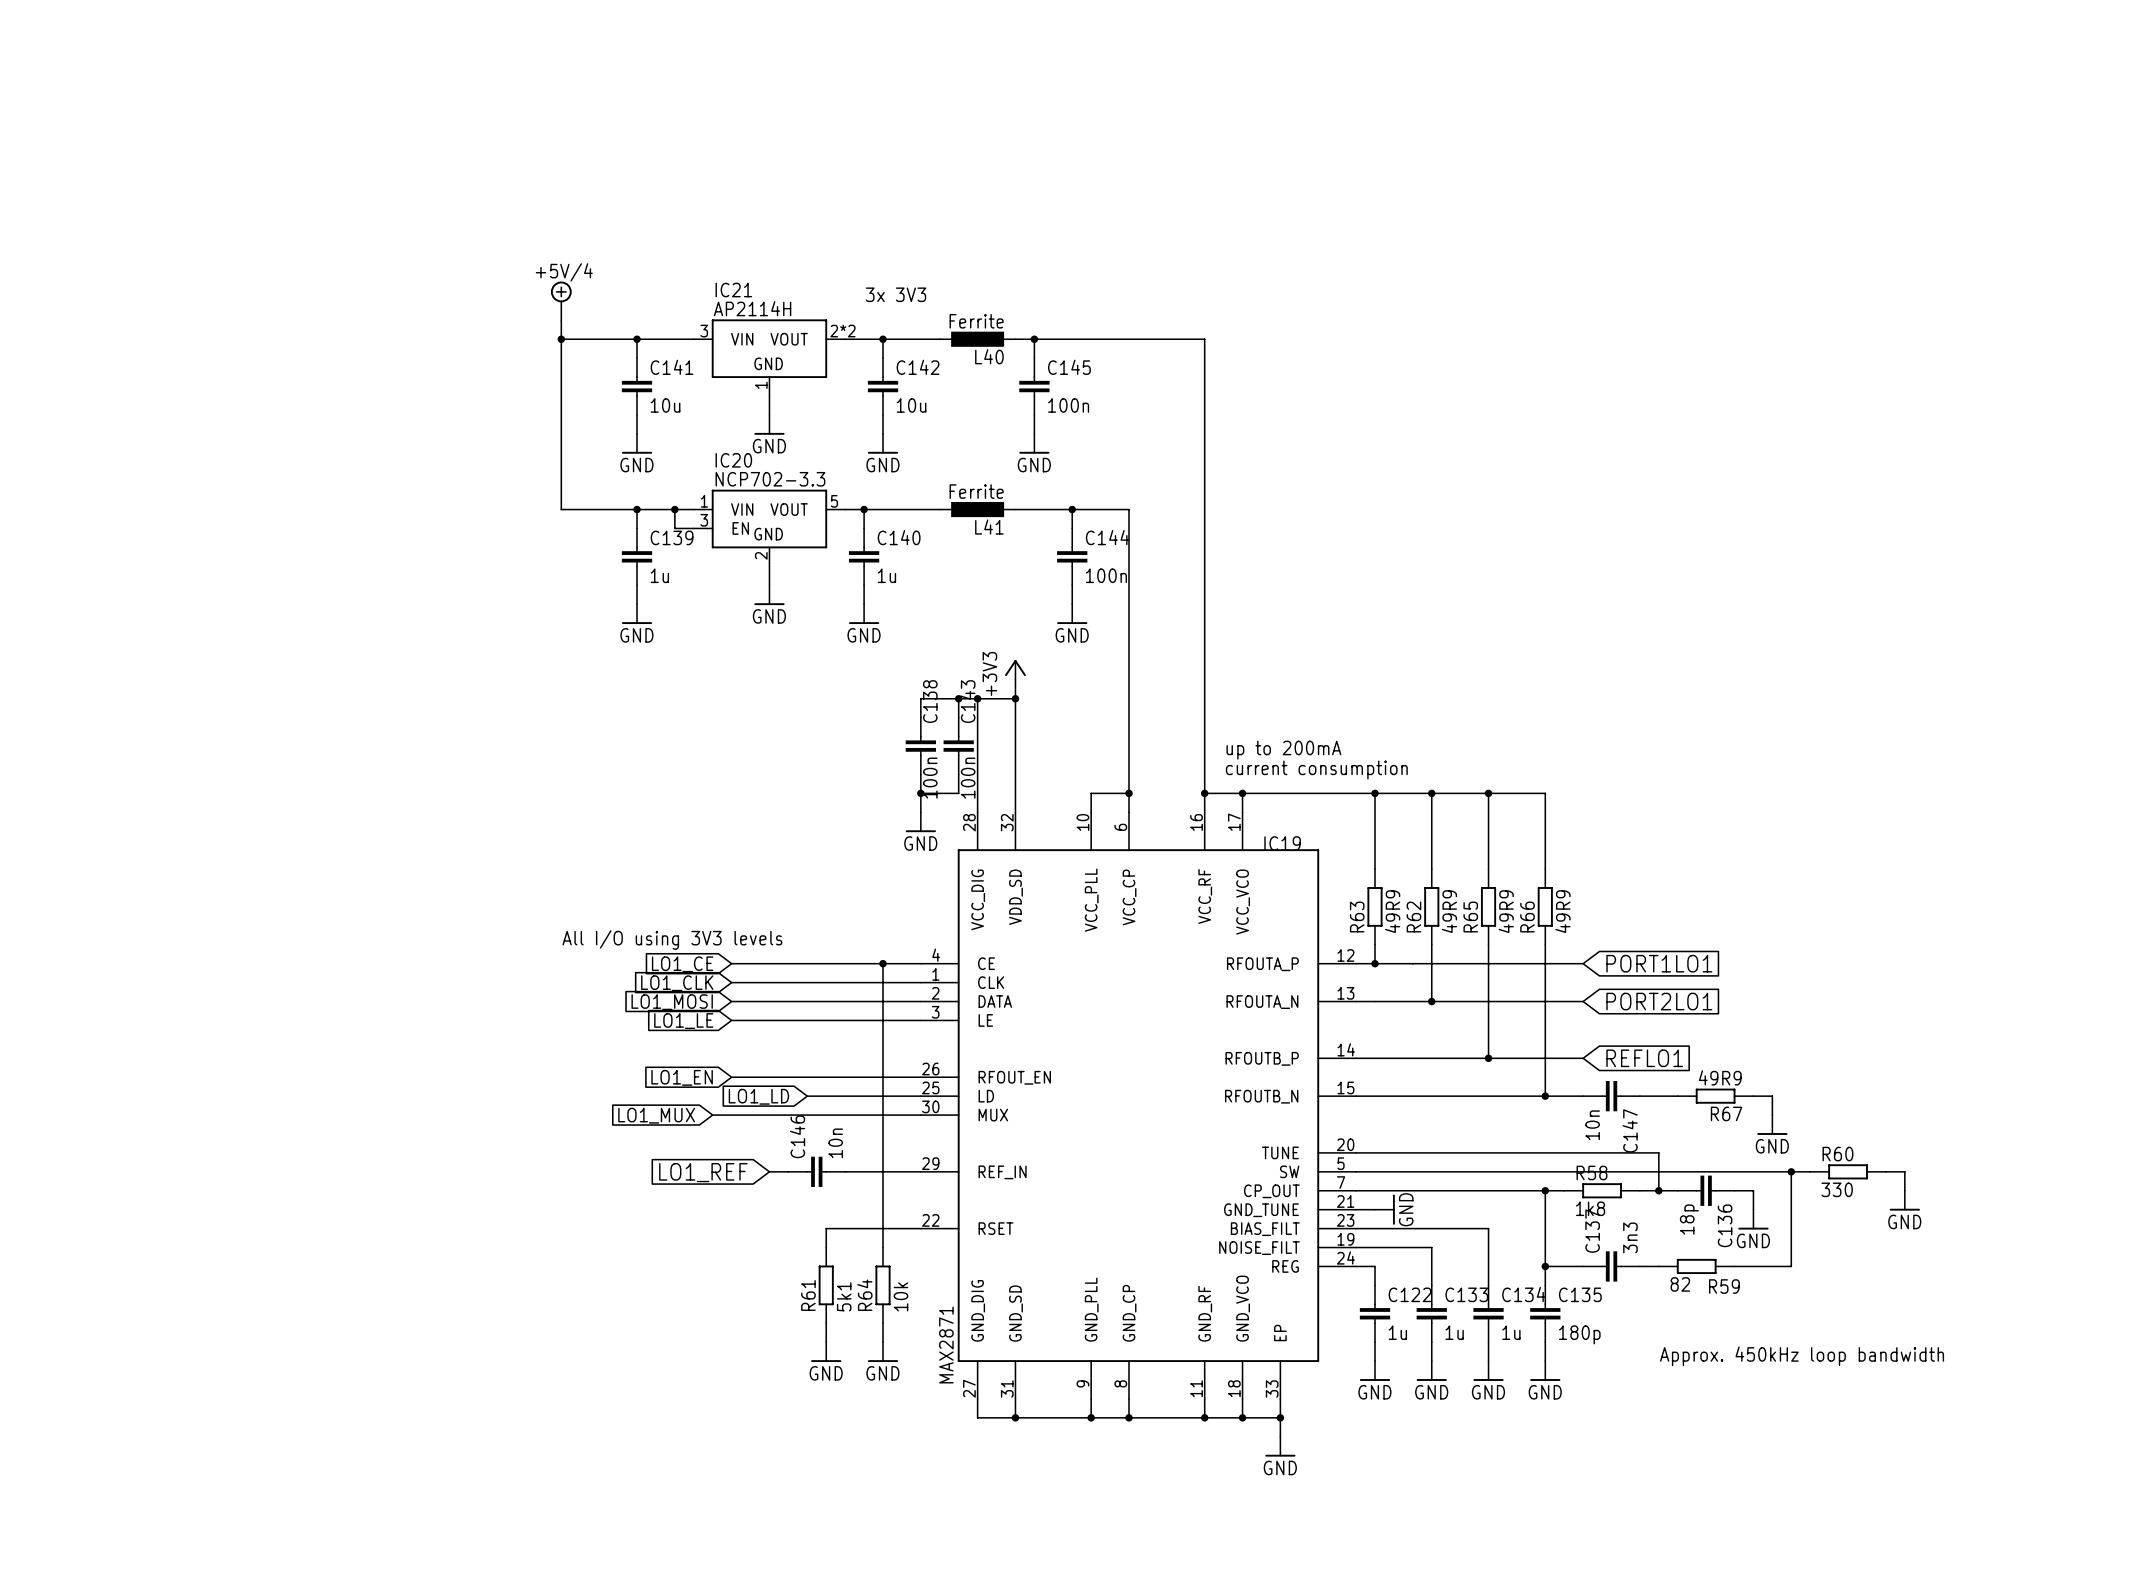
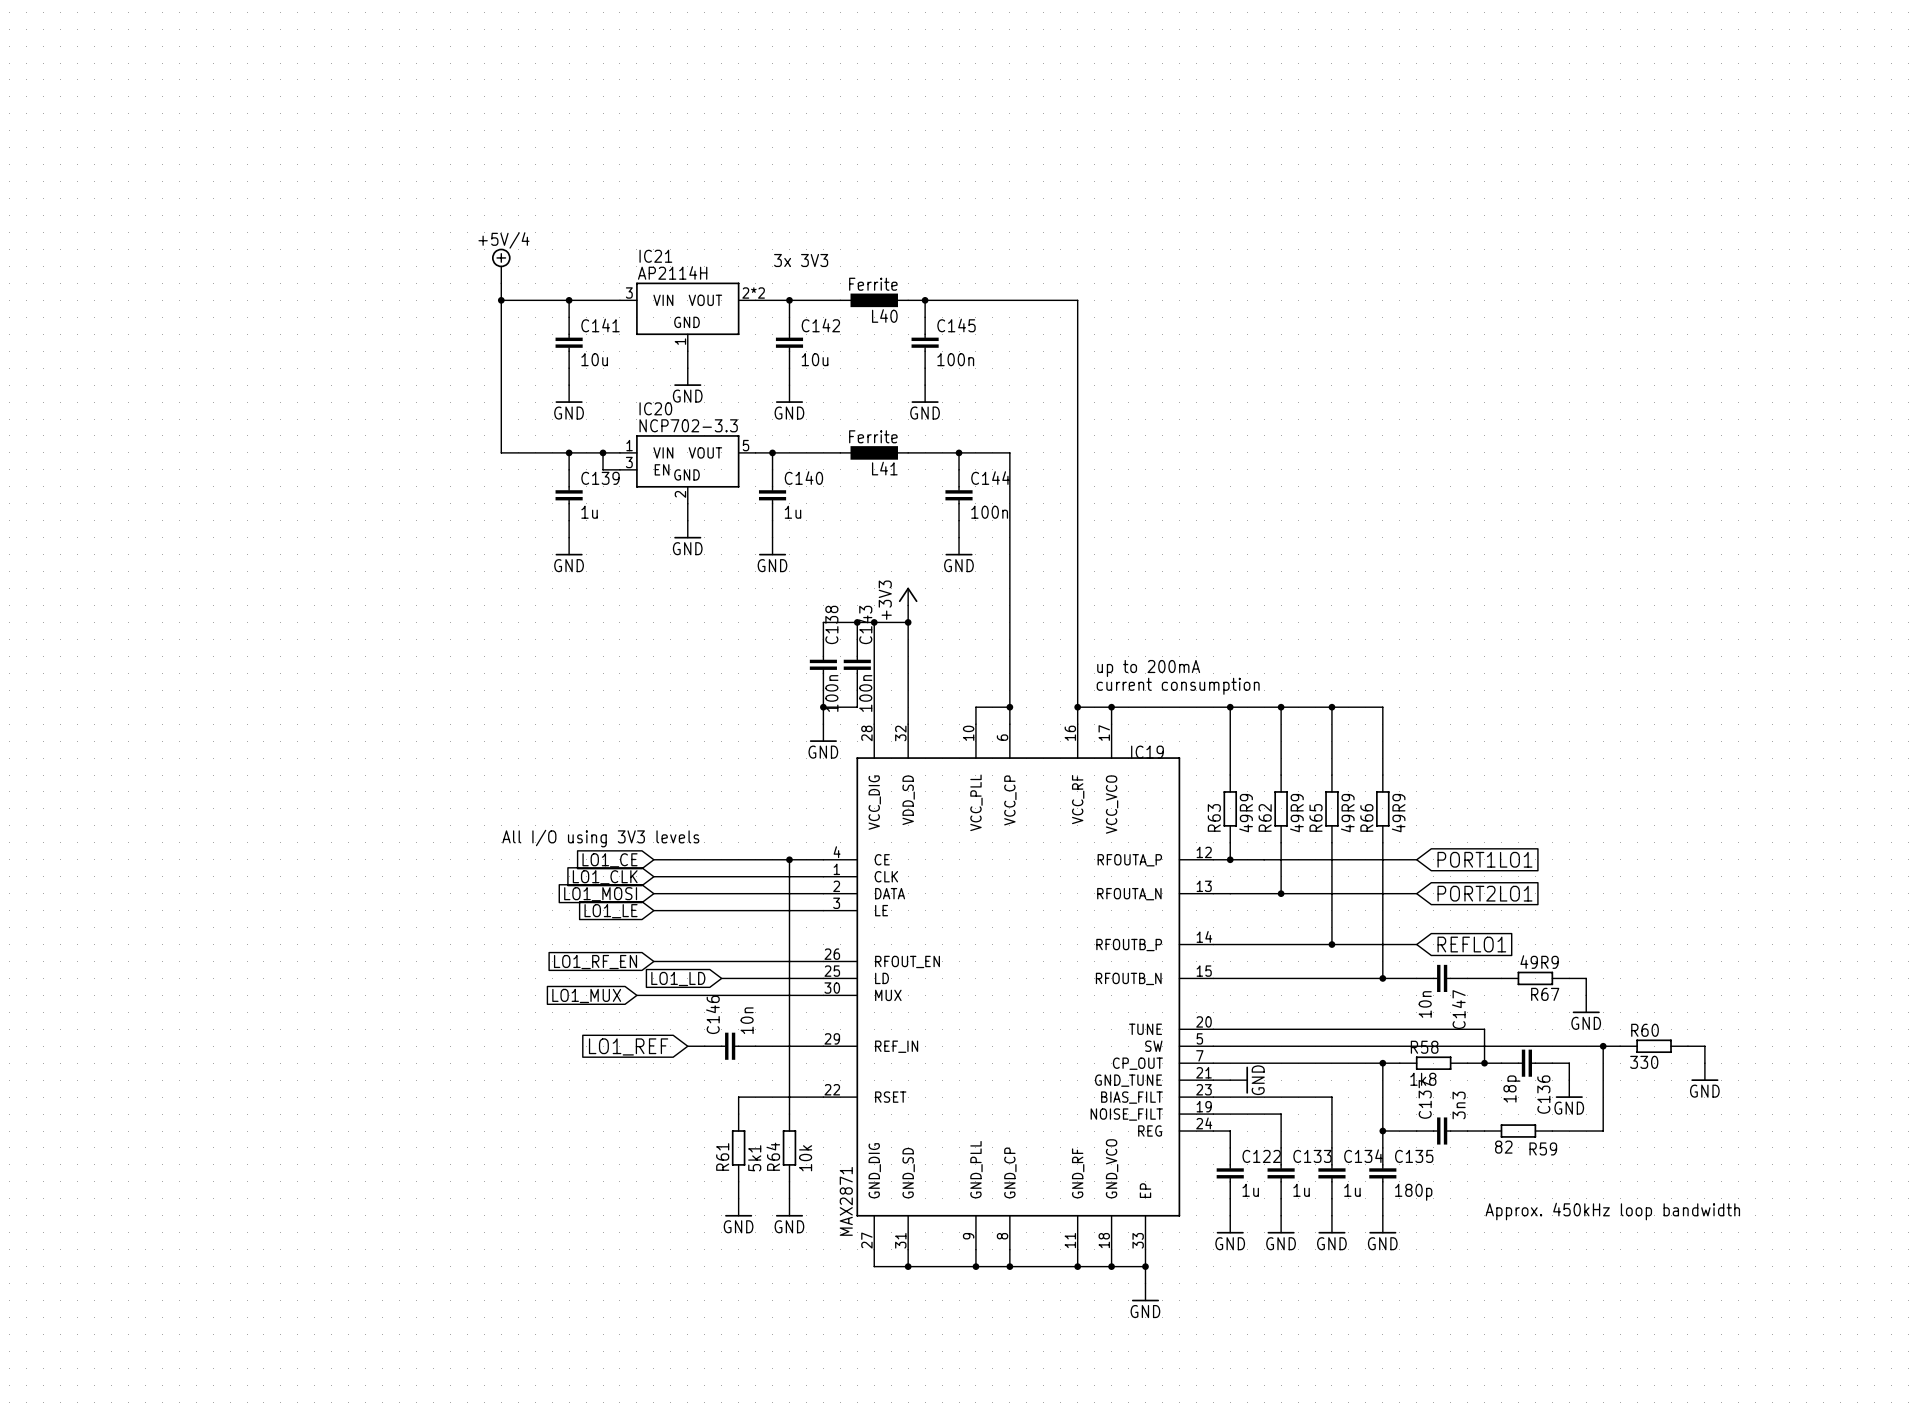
global label: LO1_EN (682, 1077) -> LO1_RF_EN (595, 962)

